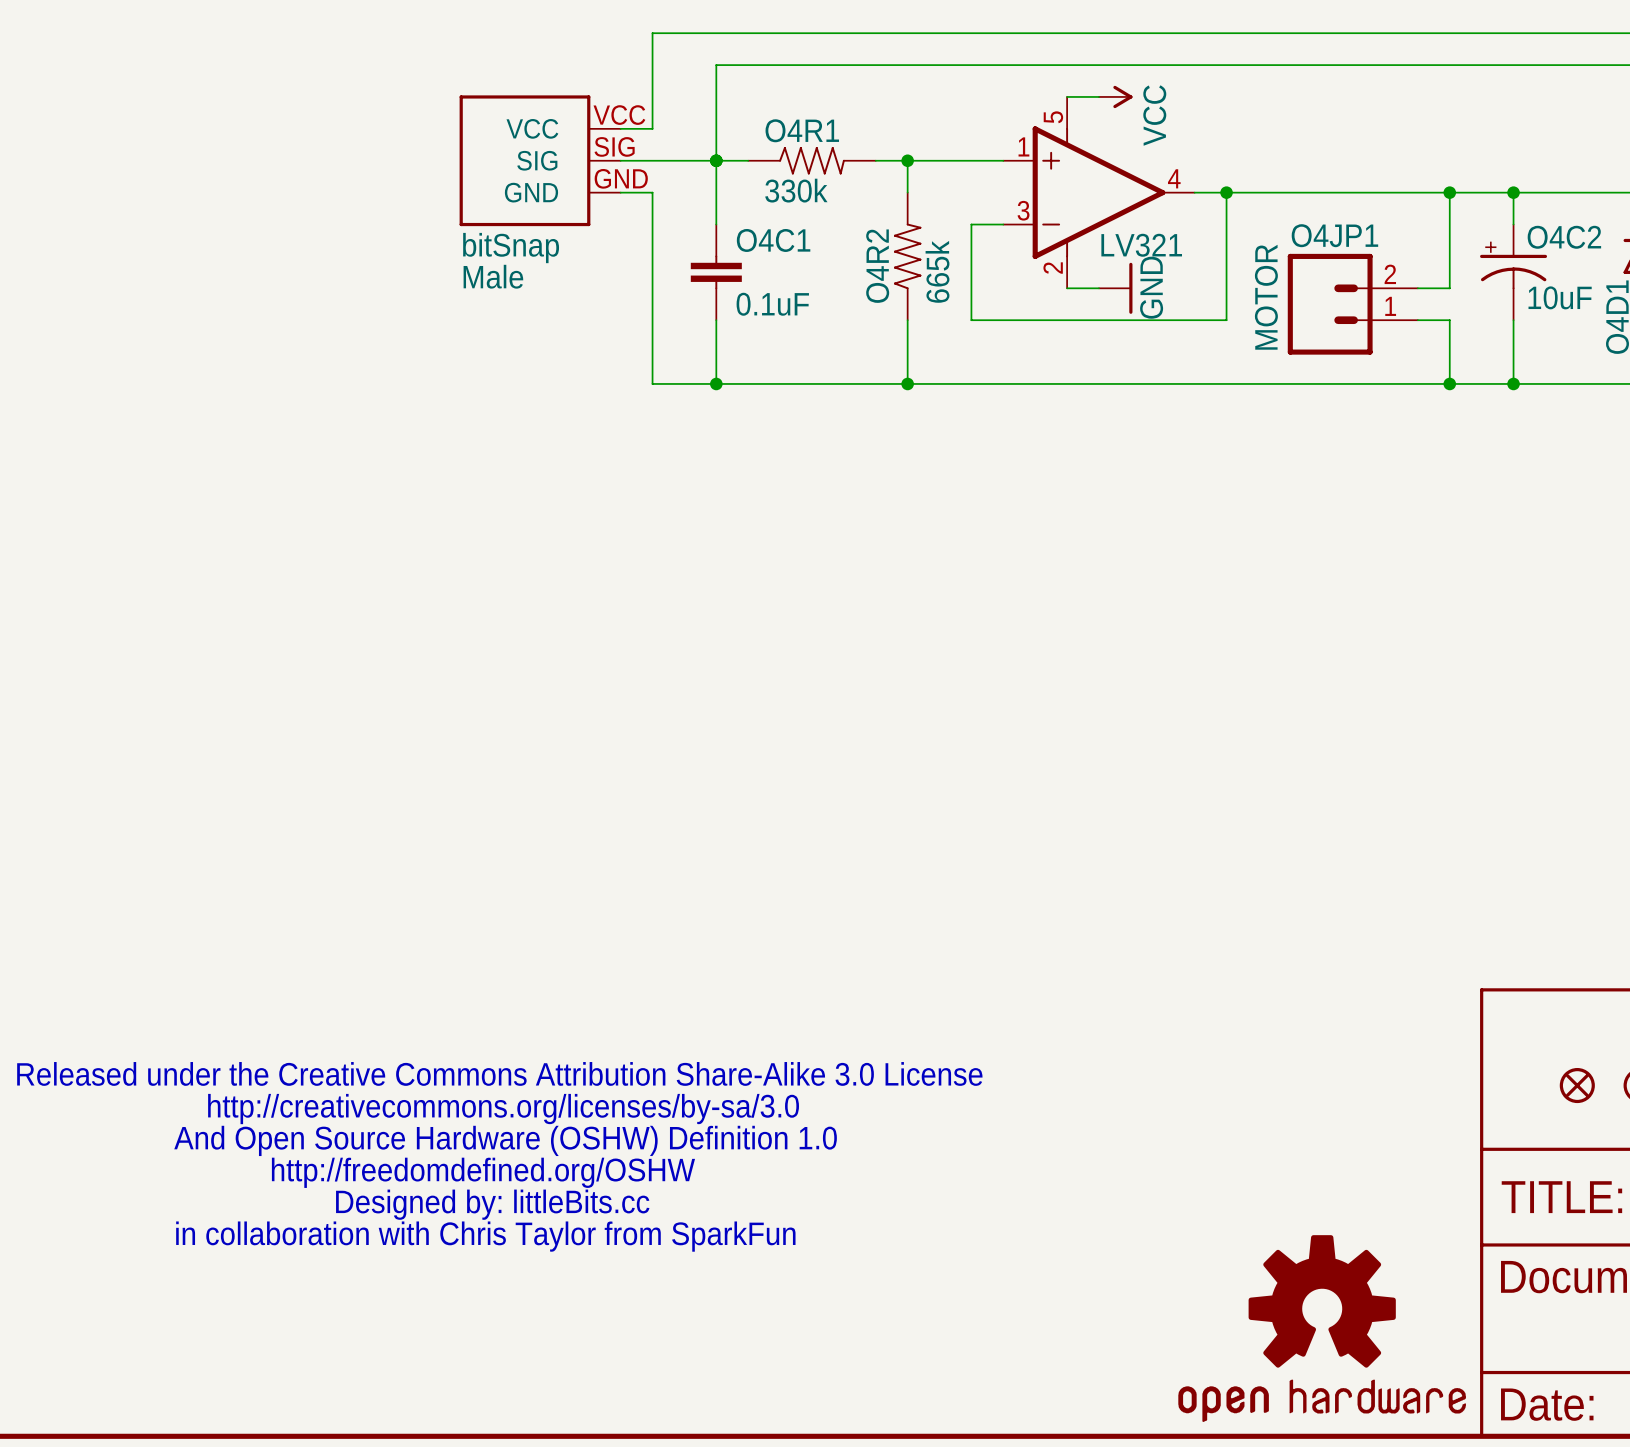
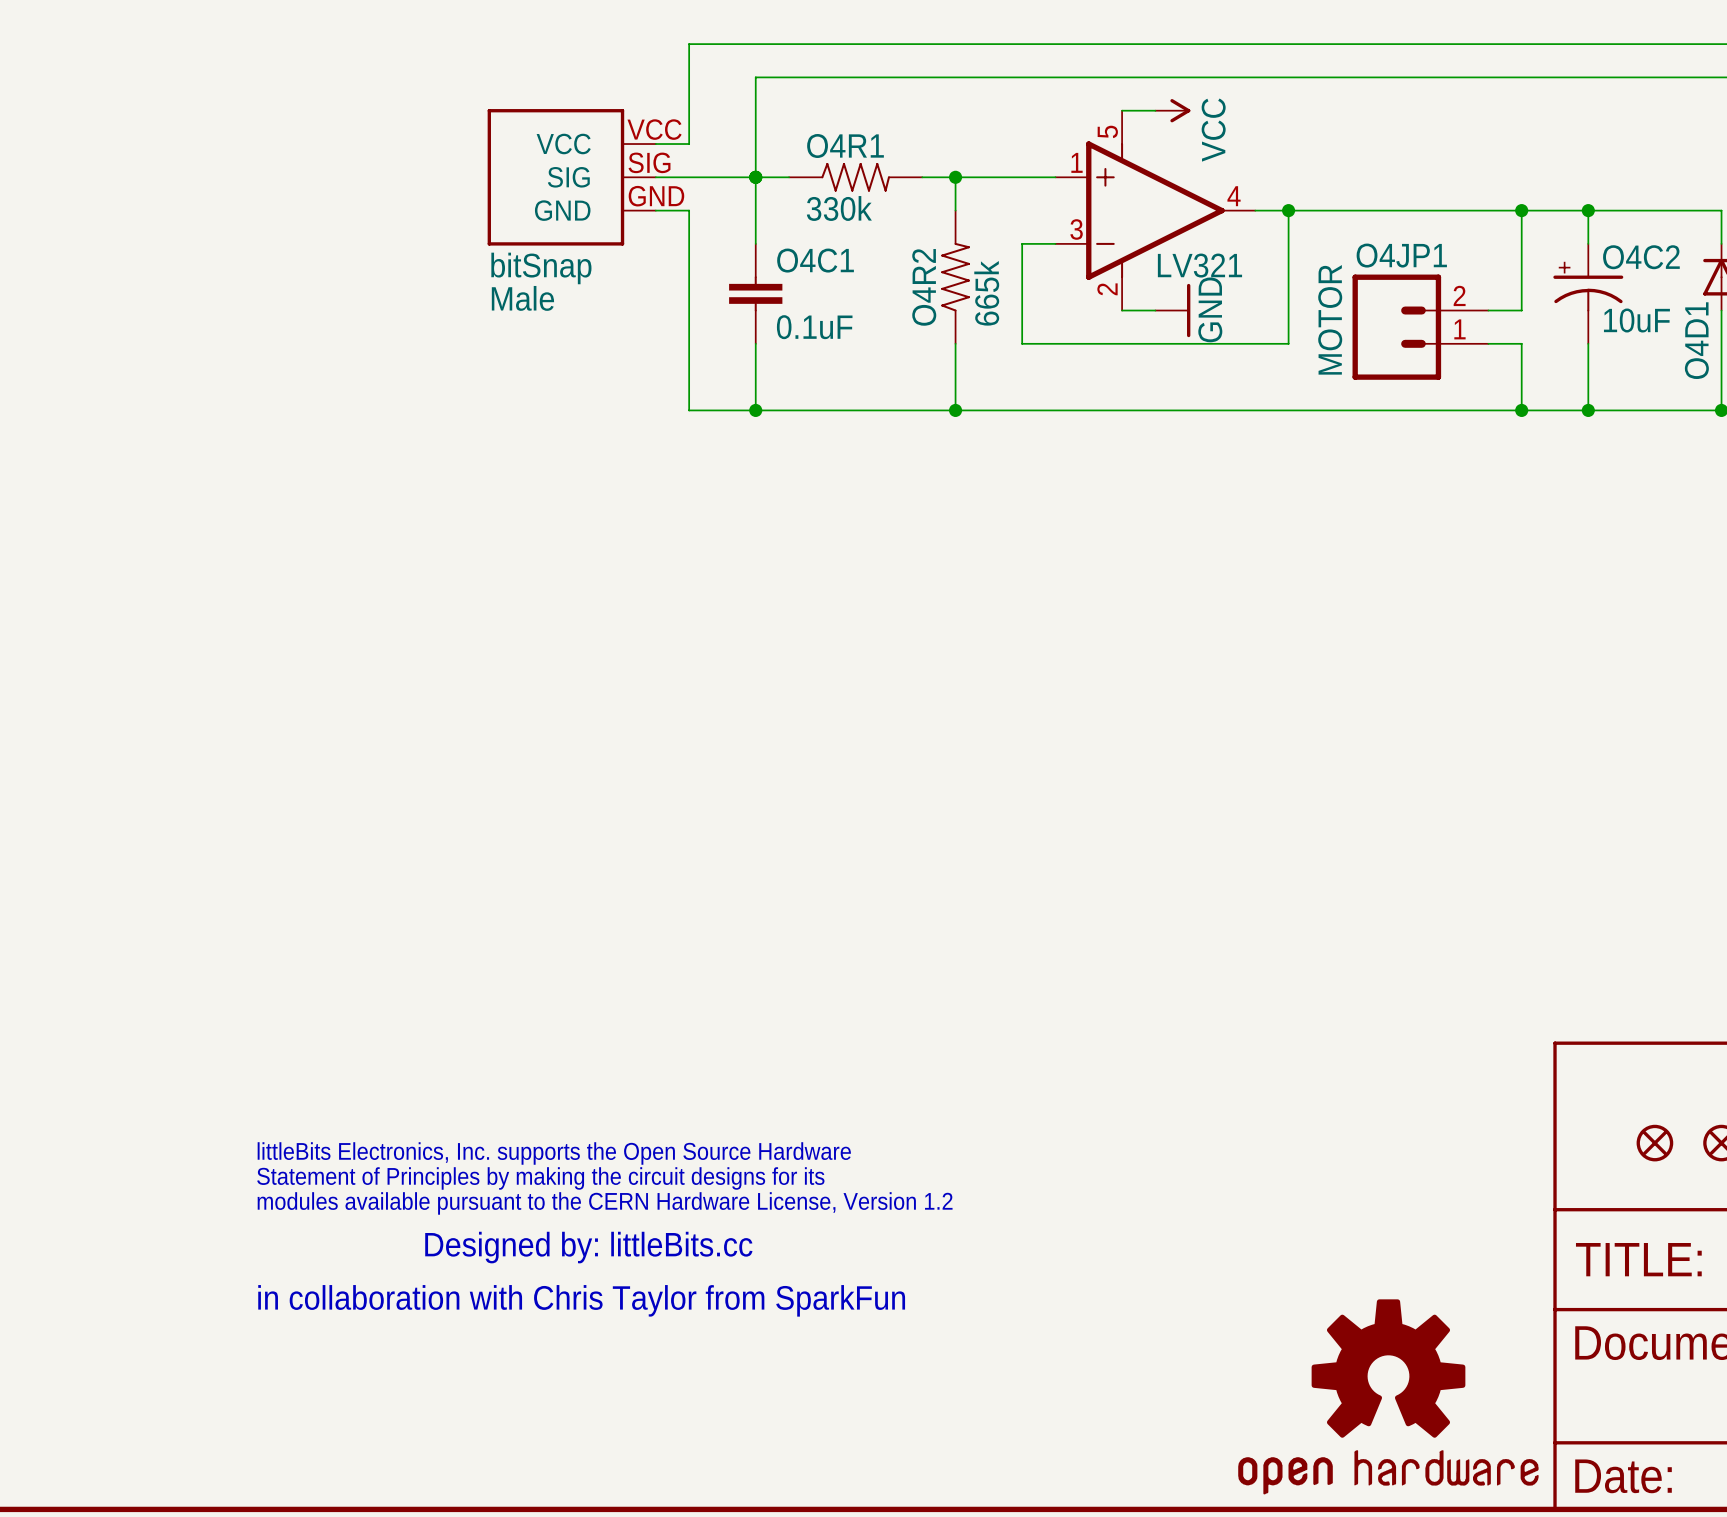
part: none -> (604, 1202)
part: (499, 1156) -> none
text: none -> in collaboration with Chris Taylor from SparkFun (581, 1300)

